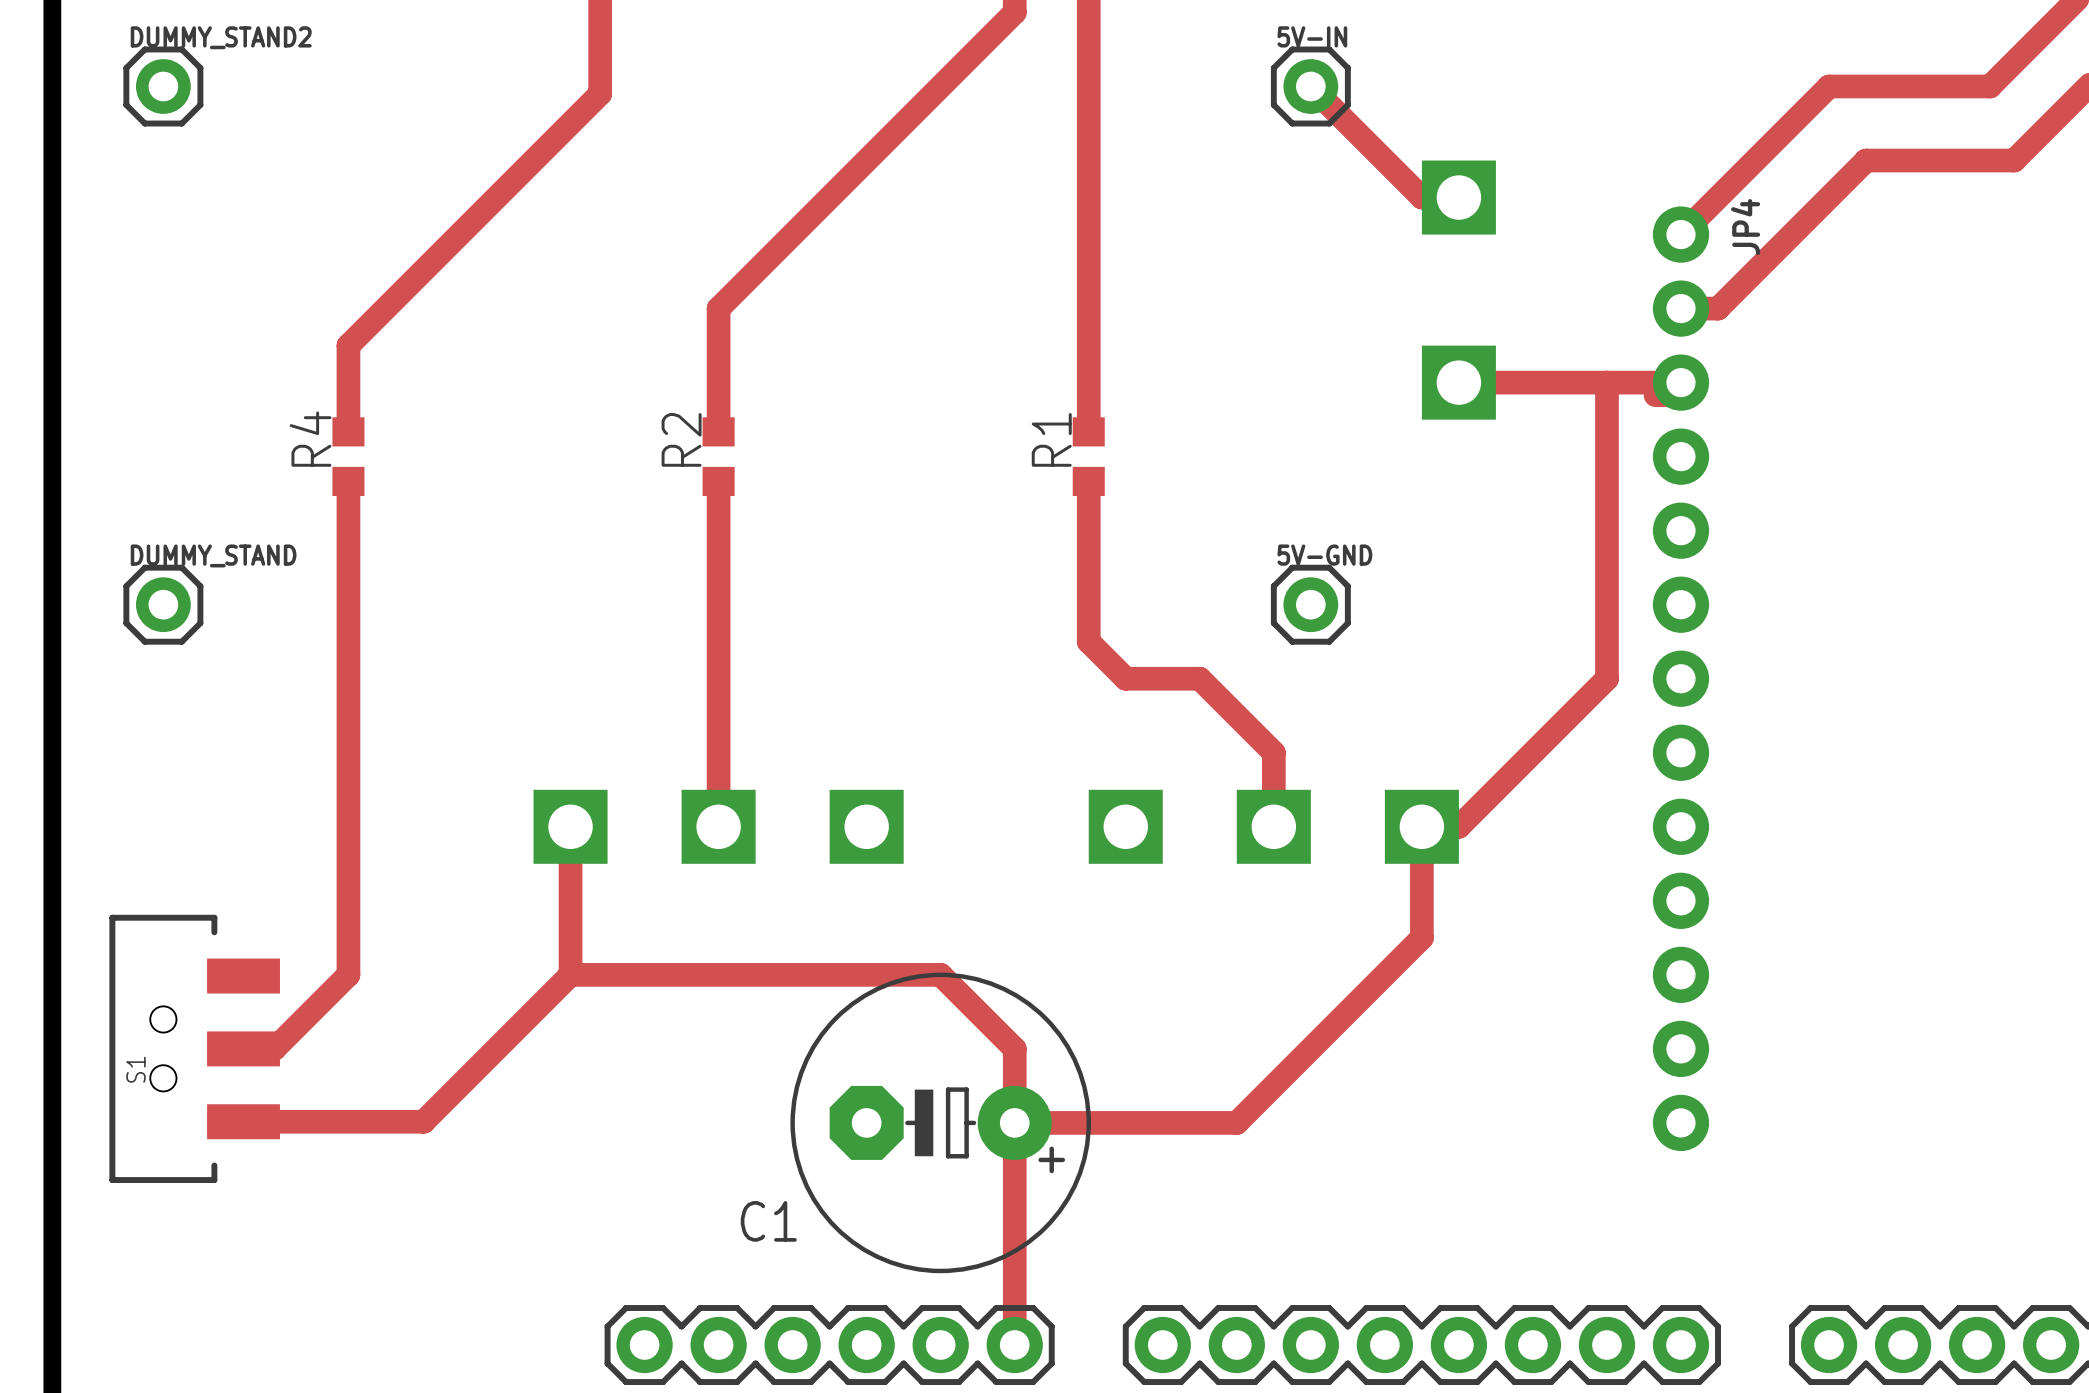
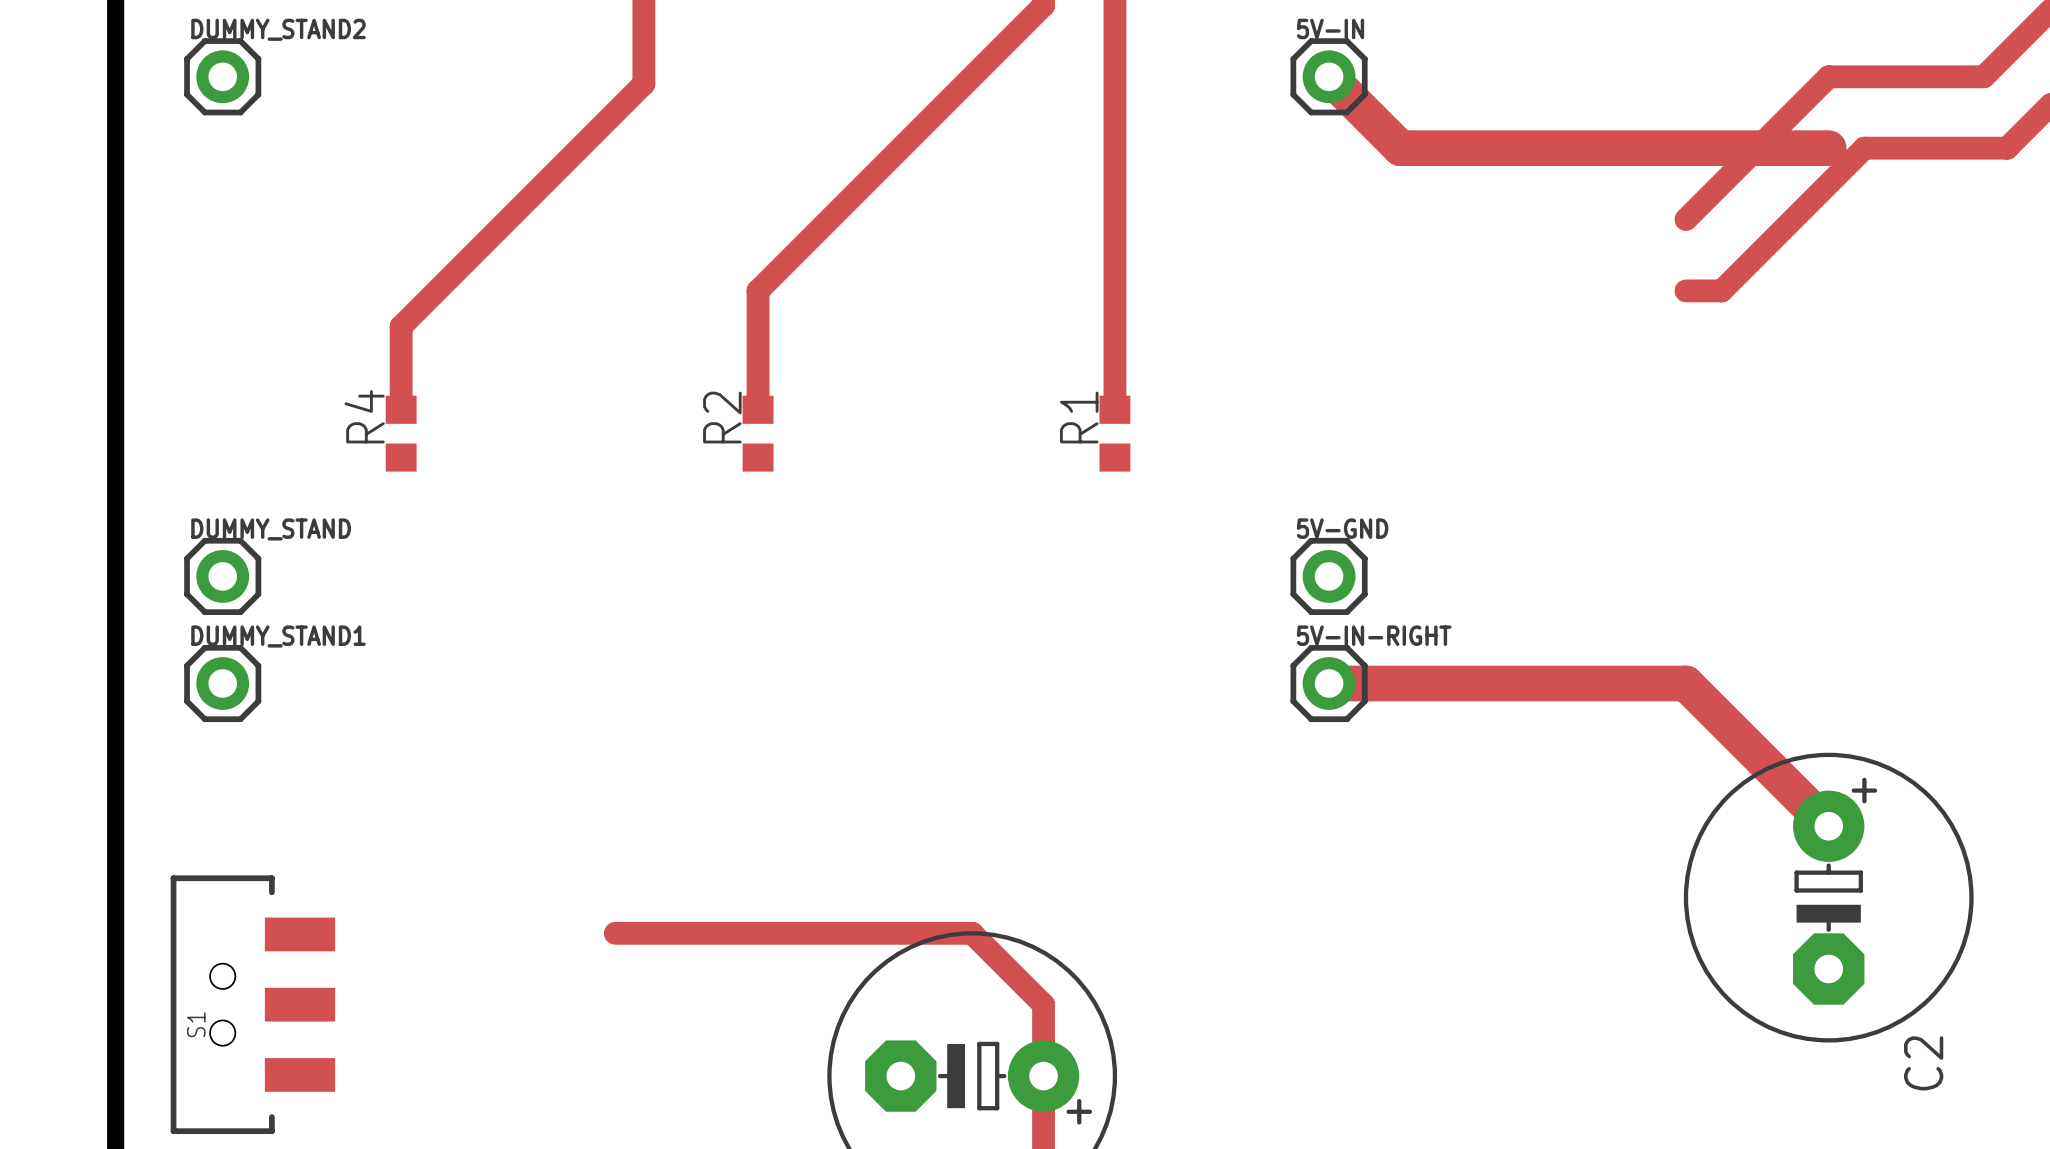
track width: thin (1310, 86) (1384, 160) -> thick (1329, 76) (1400, 148)
track: (1384, 160) (1421, 197) (1458, 197) -> (1400, 148) (1828, 148)
part: (1458, 197) -> none
track: (1458, 382) (1680, 382) (1668, 395) (1655, 395) -> none
part: (1458, 382) -> none
track: (1606, 382) (1606, 678) (1458, 826) (1421, 826) (1421, 937) (1236, 1122) (1014, 1122) -> none
track: (348, 481) (348, 974) (274, 1048) (243, 1048) -> none
track: (718, 481) (718, 826) -> none
track: (1088, 481) (1088, 641) (1125, 678) (1199, 678) (1273, 752) (1273, 826) -> none
JP4: (1680, 678) -> none
DUMMY_STAND1: none -> (222, 683)
track: none -> (1329, 683) (1685, 683) (1828, 826)
5V-IN-RIGHT: none -> (1329, 683)
track: (570, 826) (570, 974) (423, 1121) (243, 1121) -> none
part: (570, 826) -> none
part: (718, 826) -> none
part: (866, 826) -> none
part: (1125, 826) -> none
part: (1273, 826) -> none
part: (1421, 826) -> none
C2: none -> (1828, 897)

